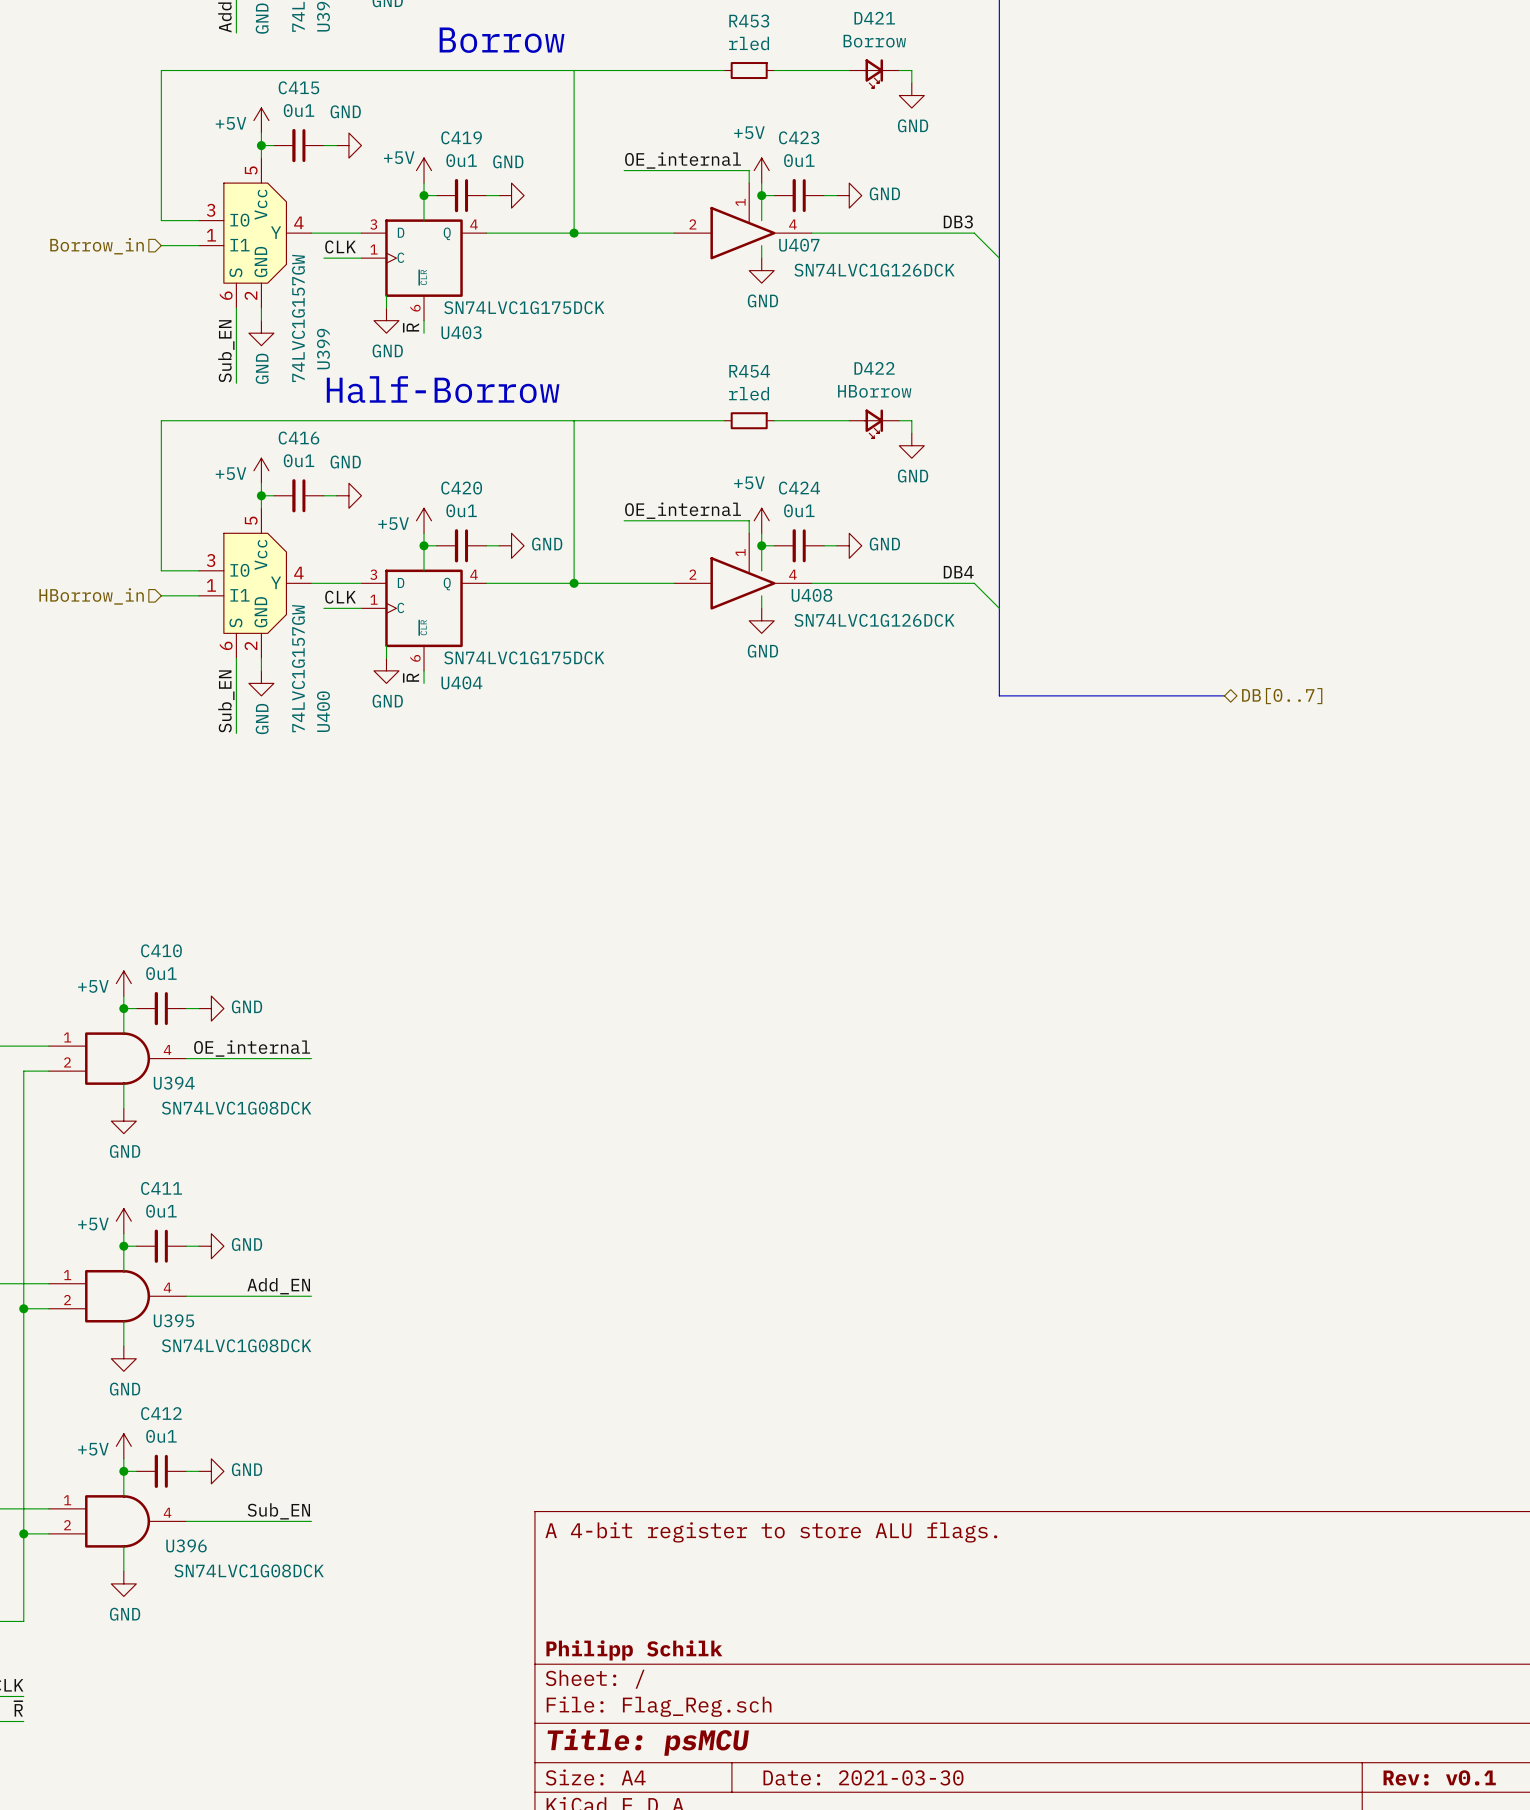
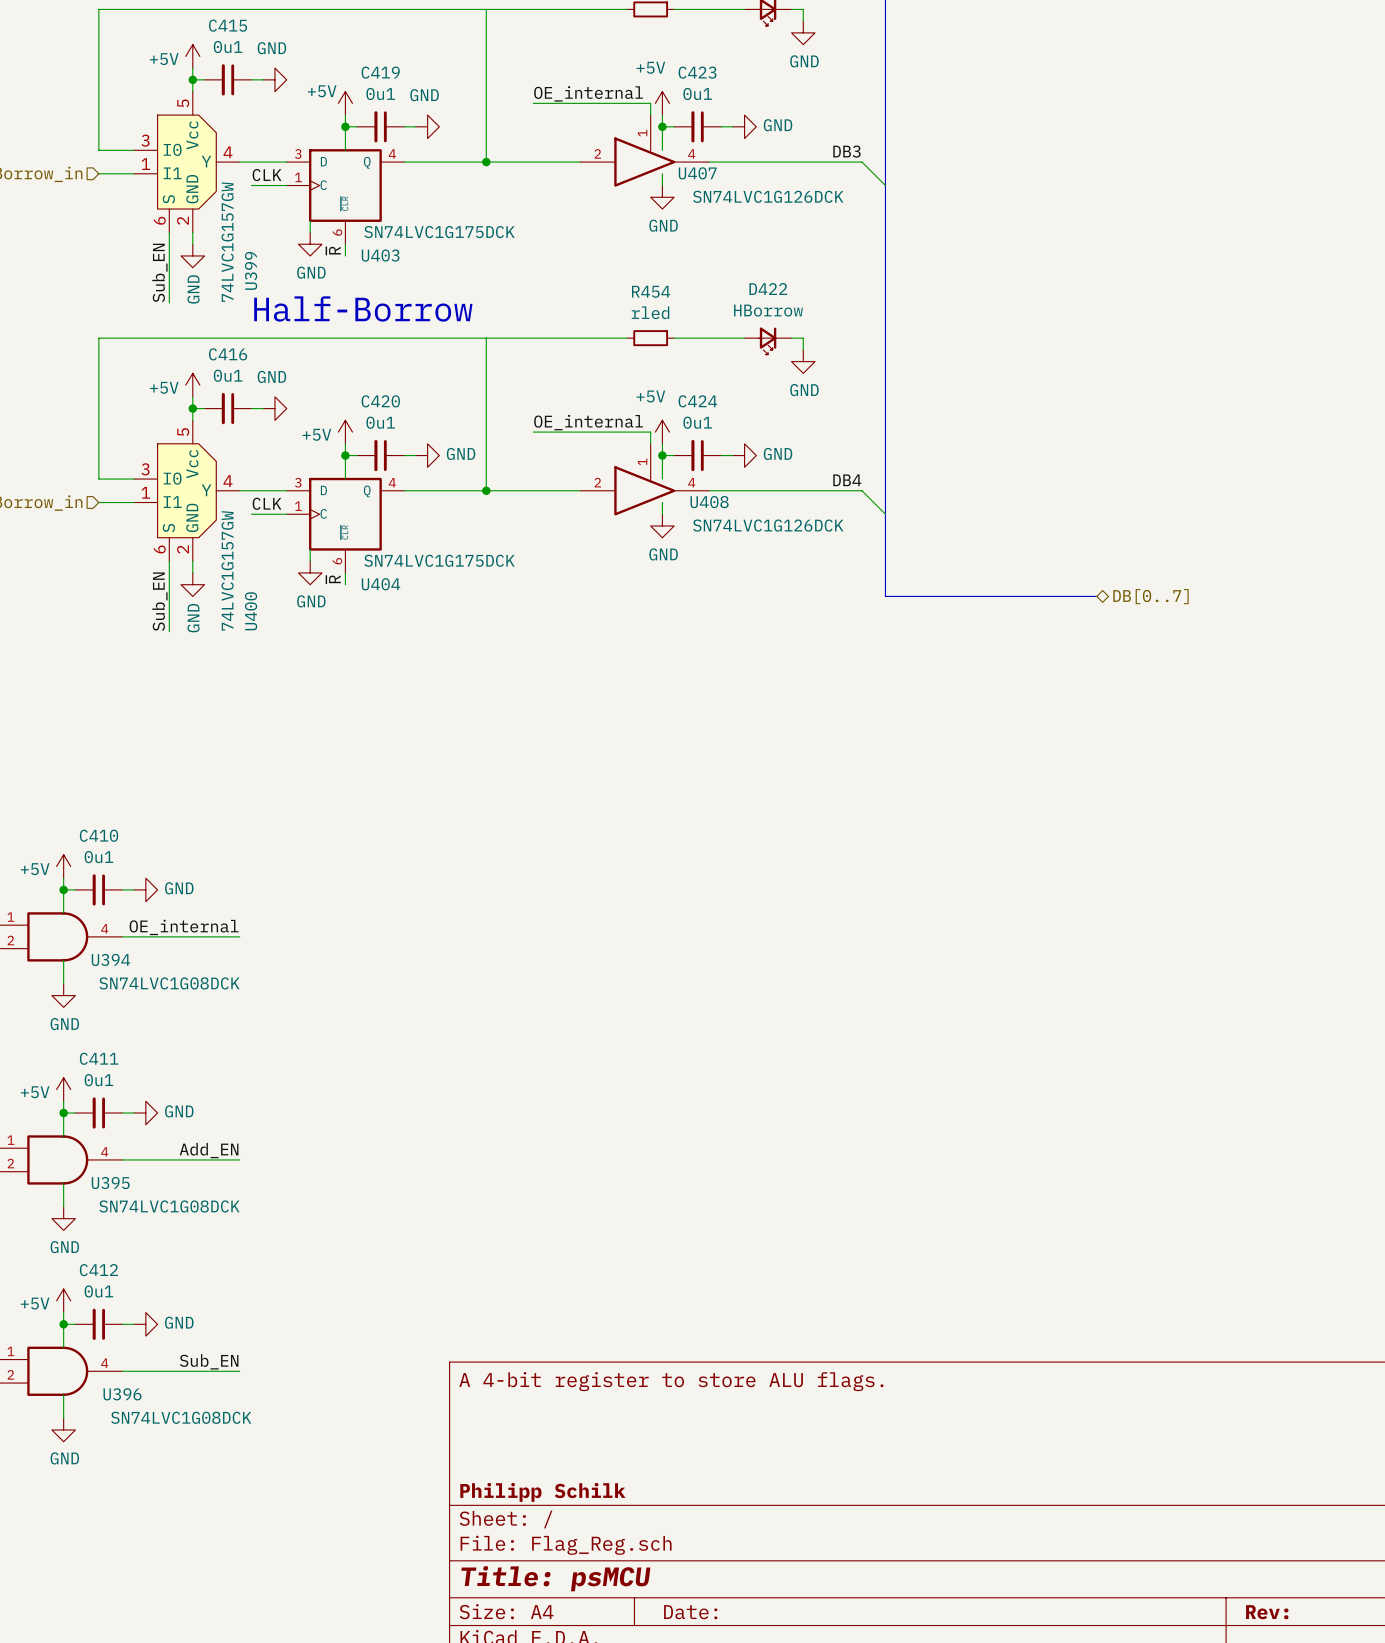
title block: Date: 2021-03-30 (863, 1777) -> Date: (690, 1612)
title block: Rev: v0.1 (1439, 1777) -> Rev: (1267, 1612)

